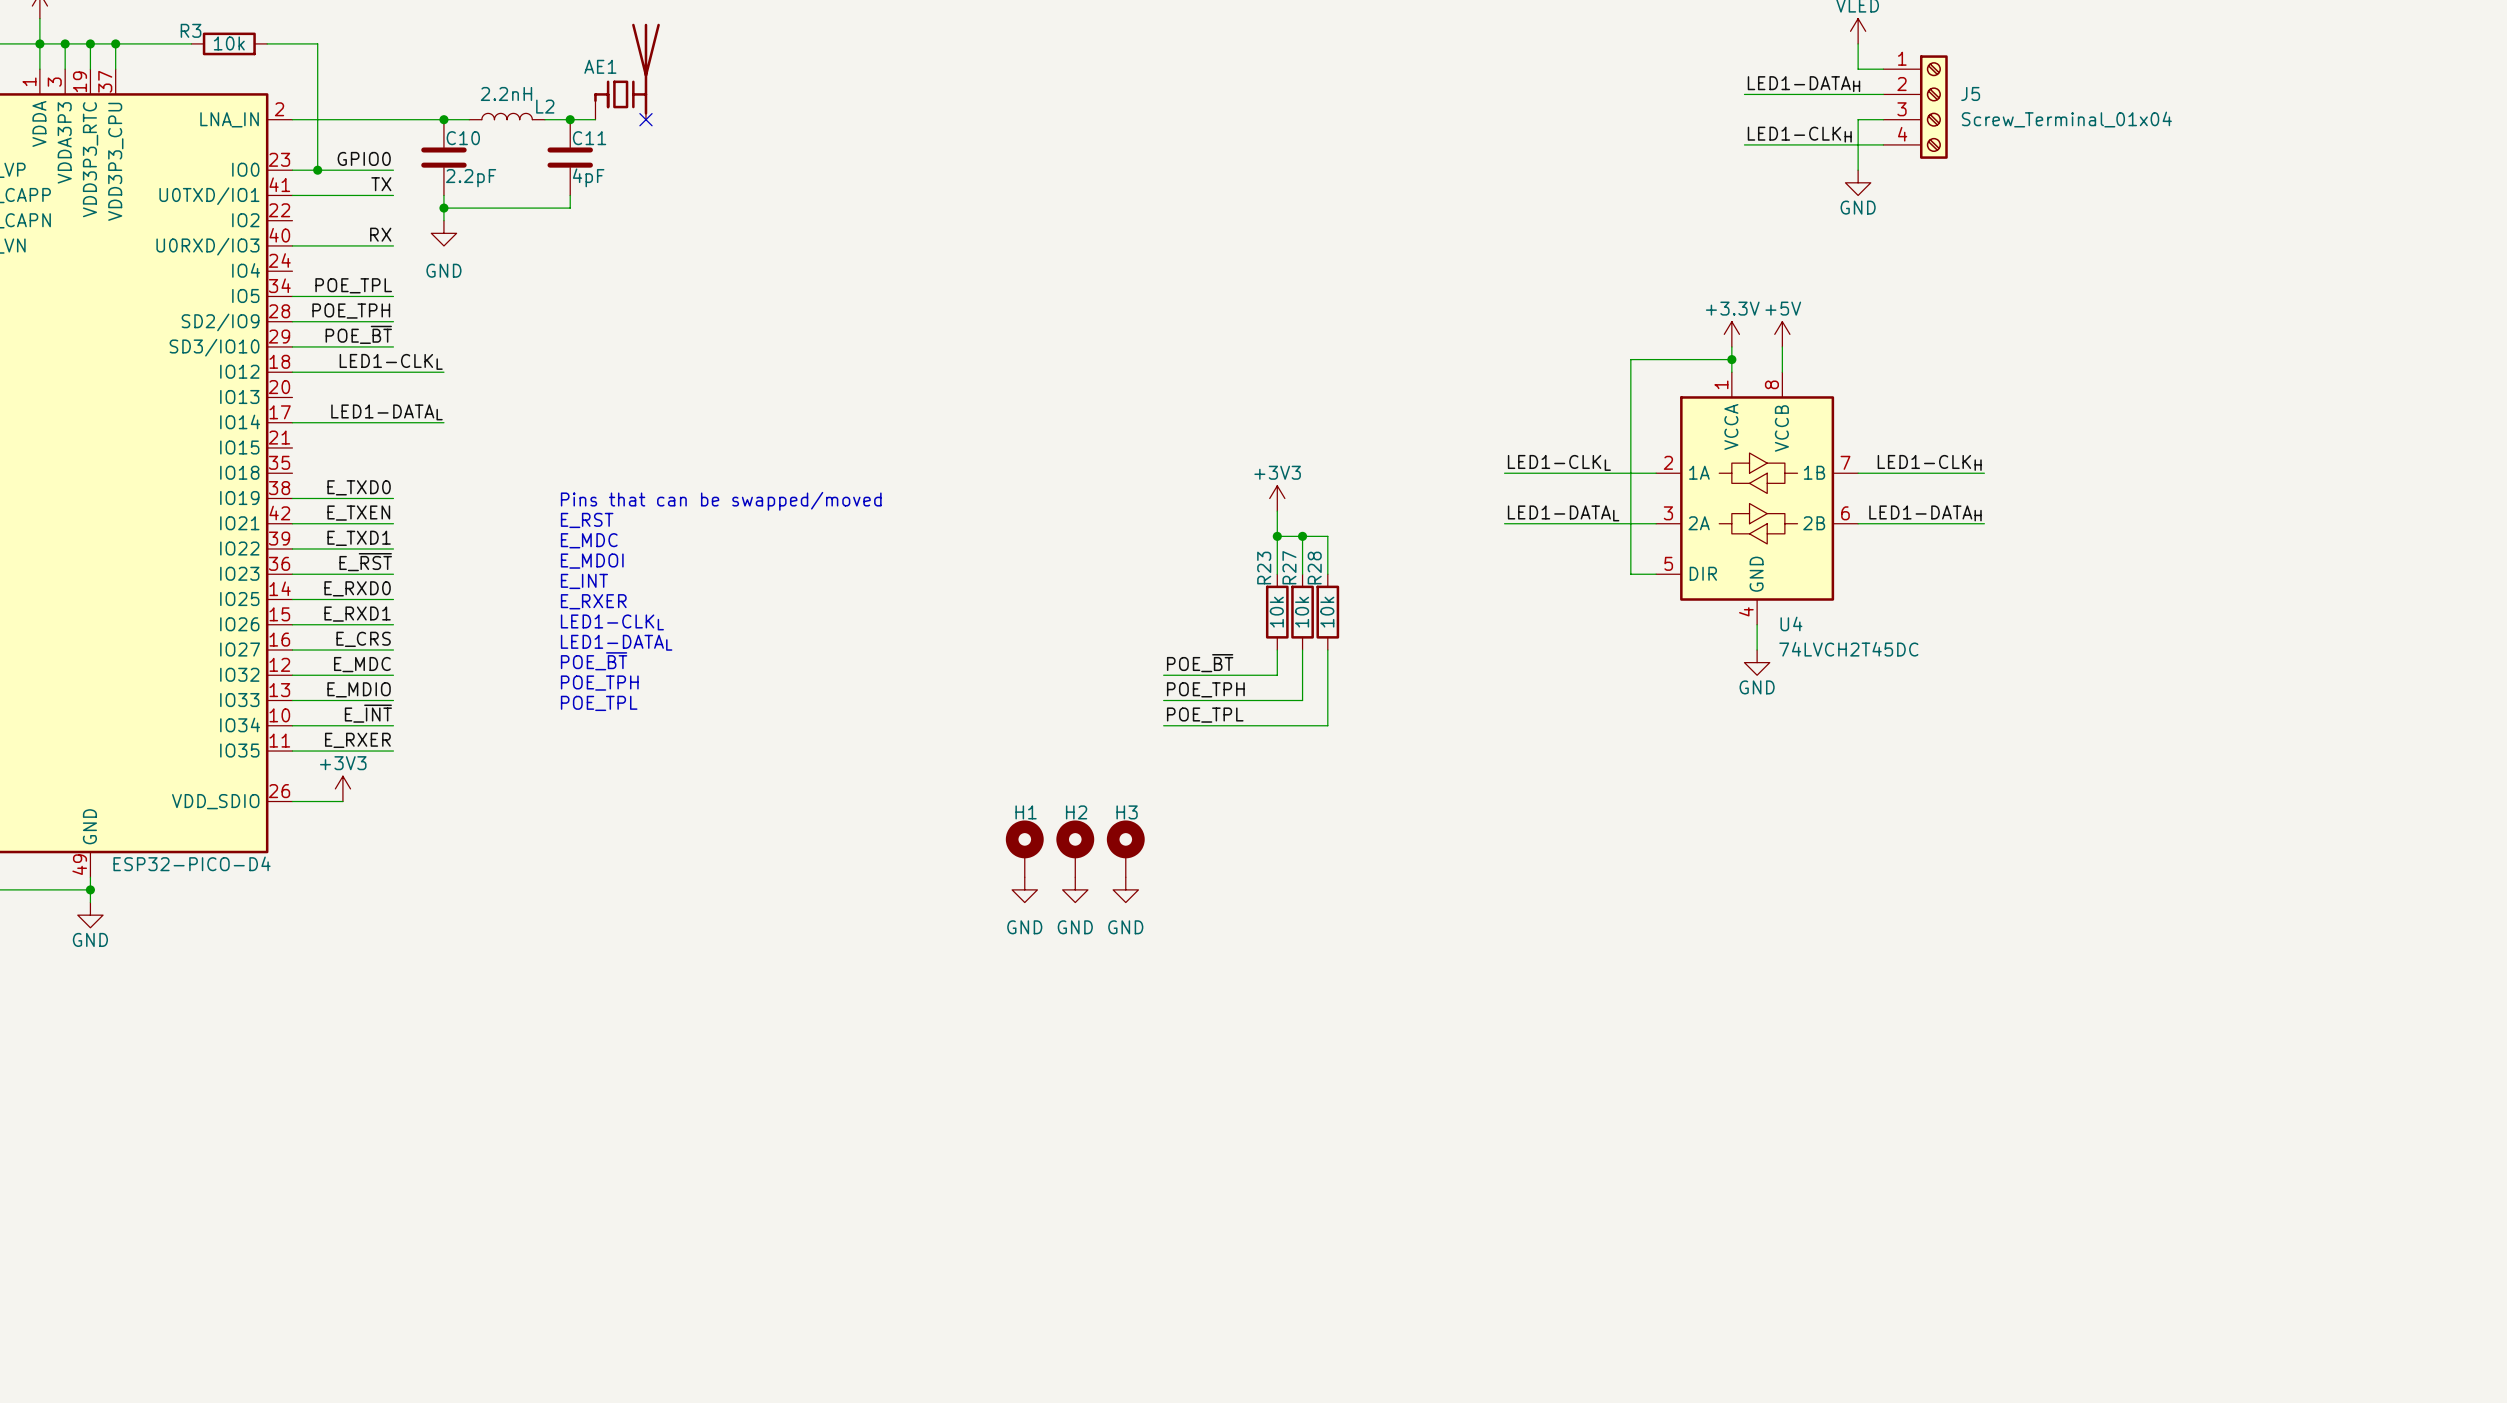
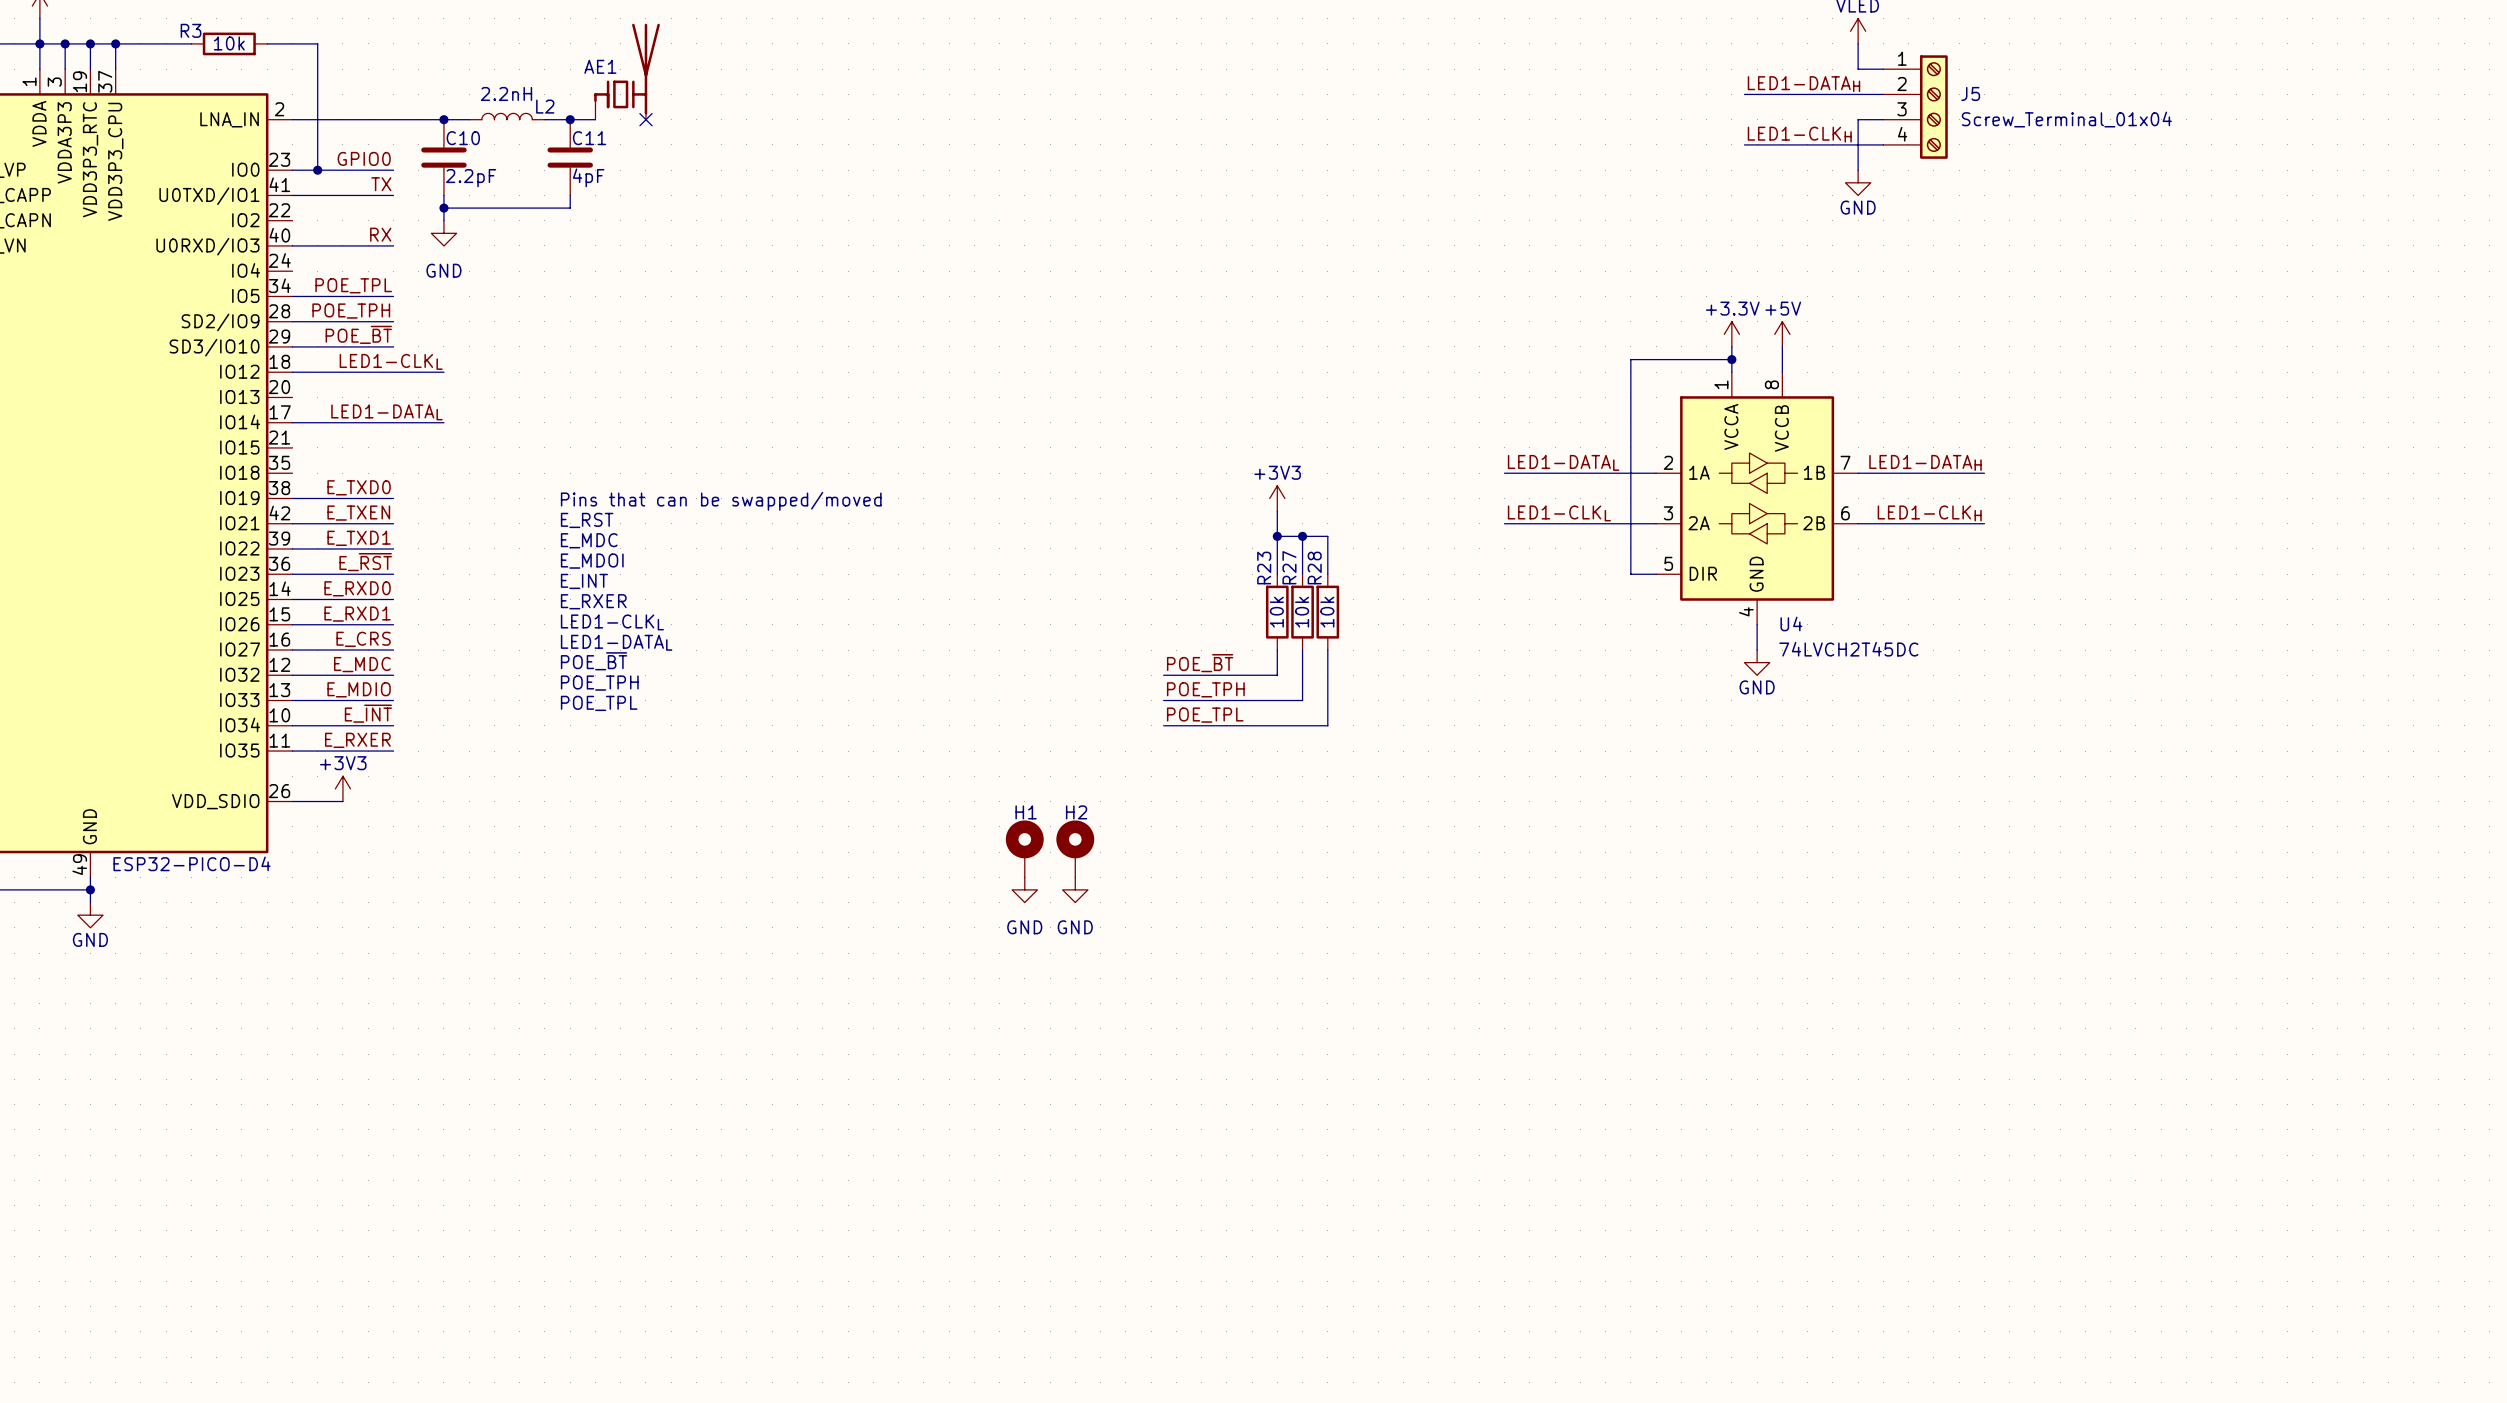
label: LED1-CLKL (1559, 462) -> LED1-DATAL (1563, 462)
label: LED1-CLKH (1929, 462) -> LED1-DATAH (1925, 462)
label: LED1-DATAL (1563, 513) -> LED1-CLKL (1559, 513)
label: LED1-DATAH (1925, 513) -> LED1-CLKH (1929, 513)
H3: (1125, 848) -> none
power symbol: GND (1125, 889) -> none

